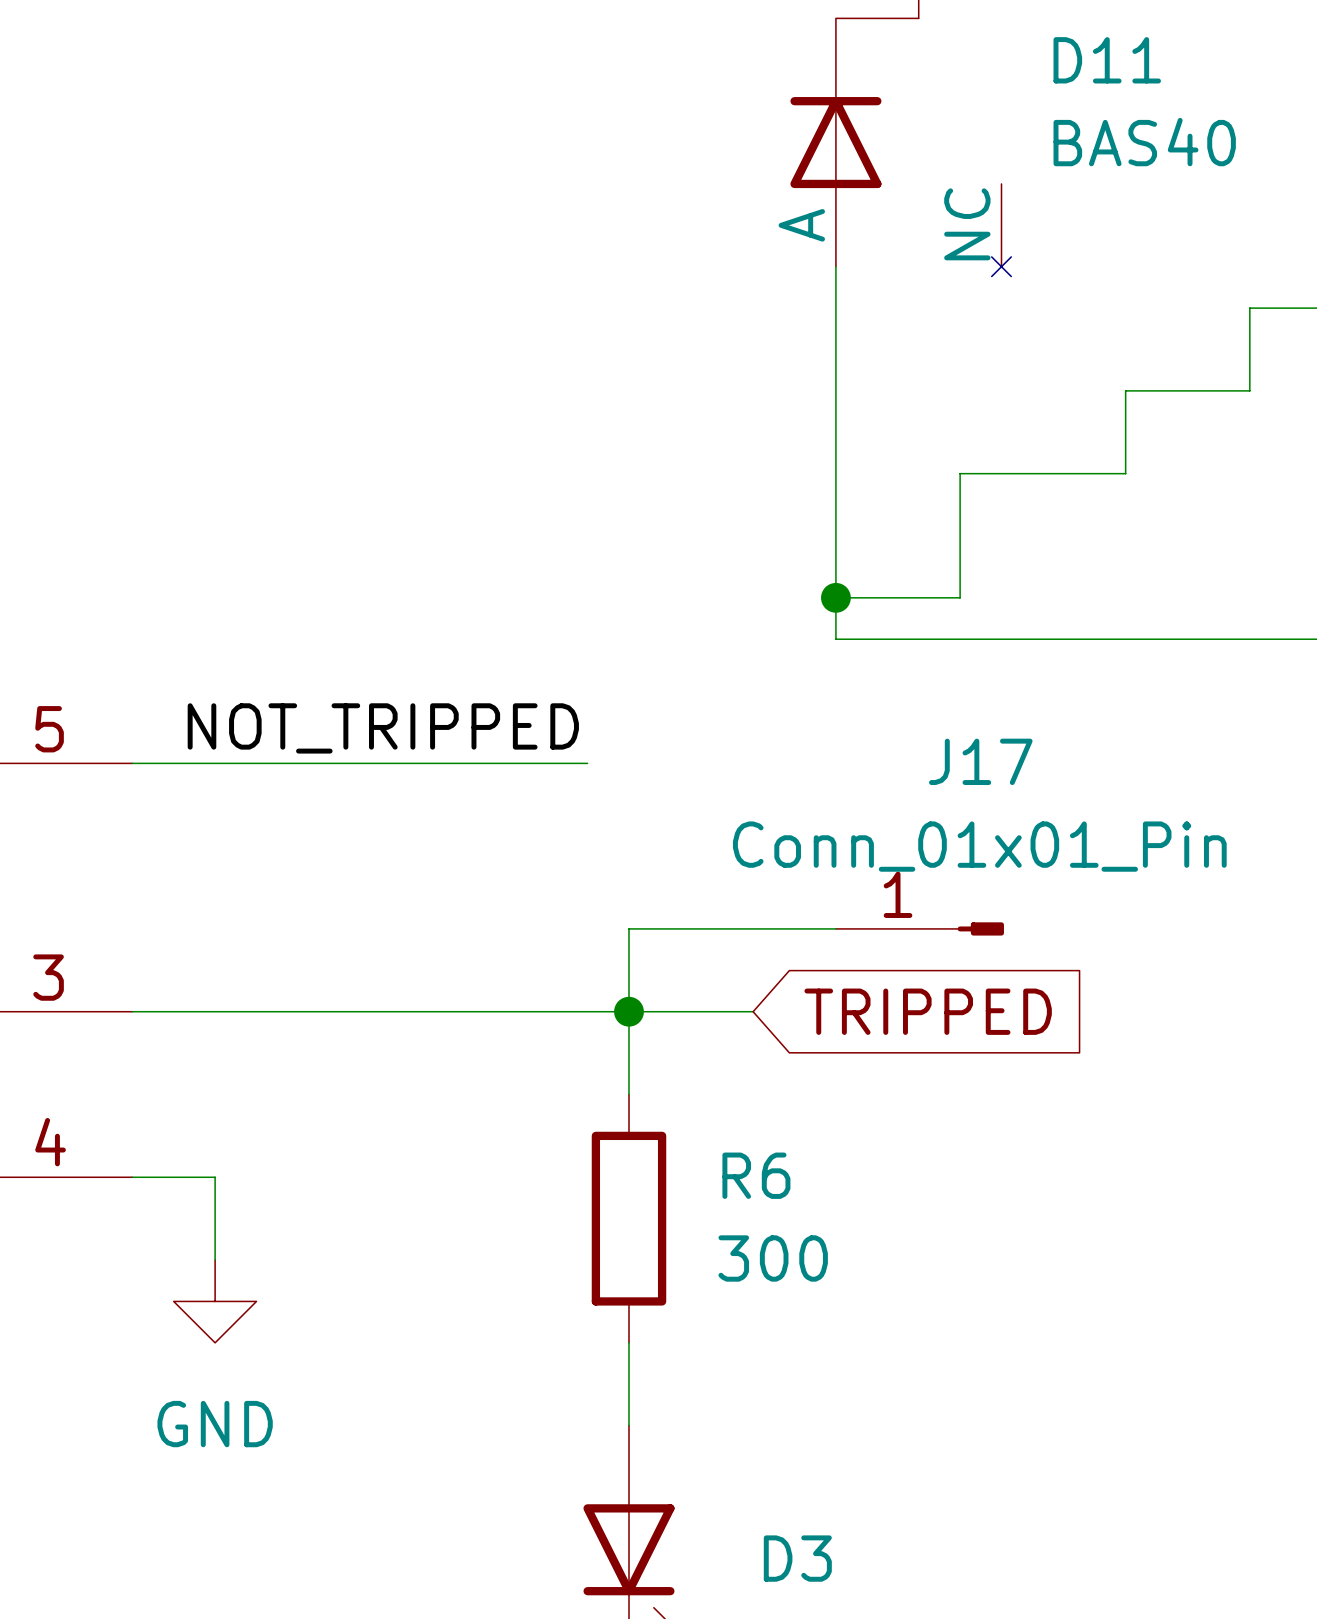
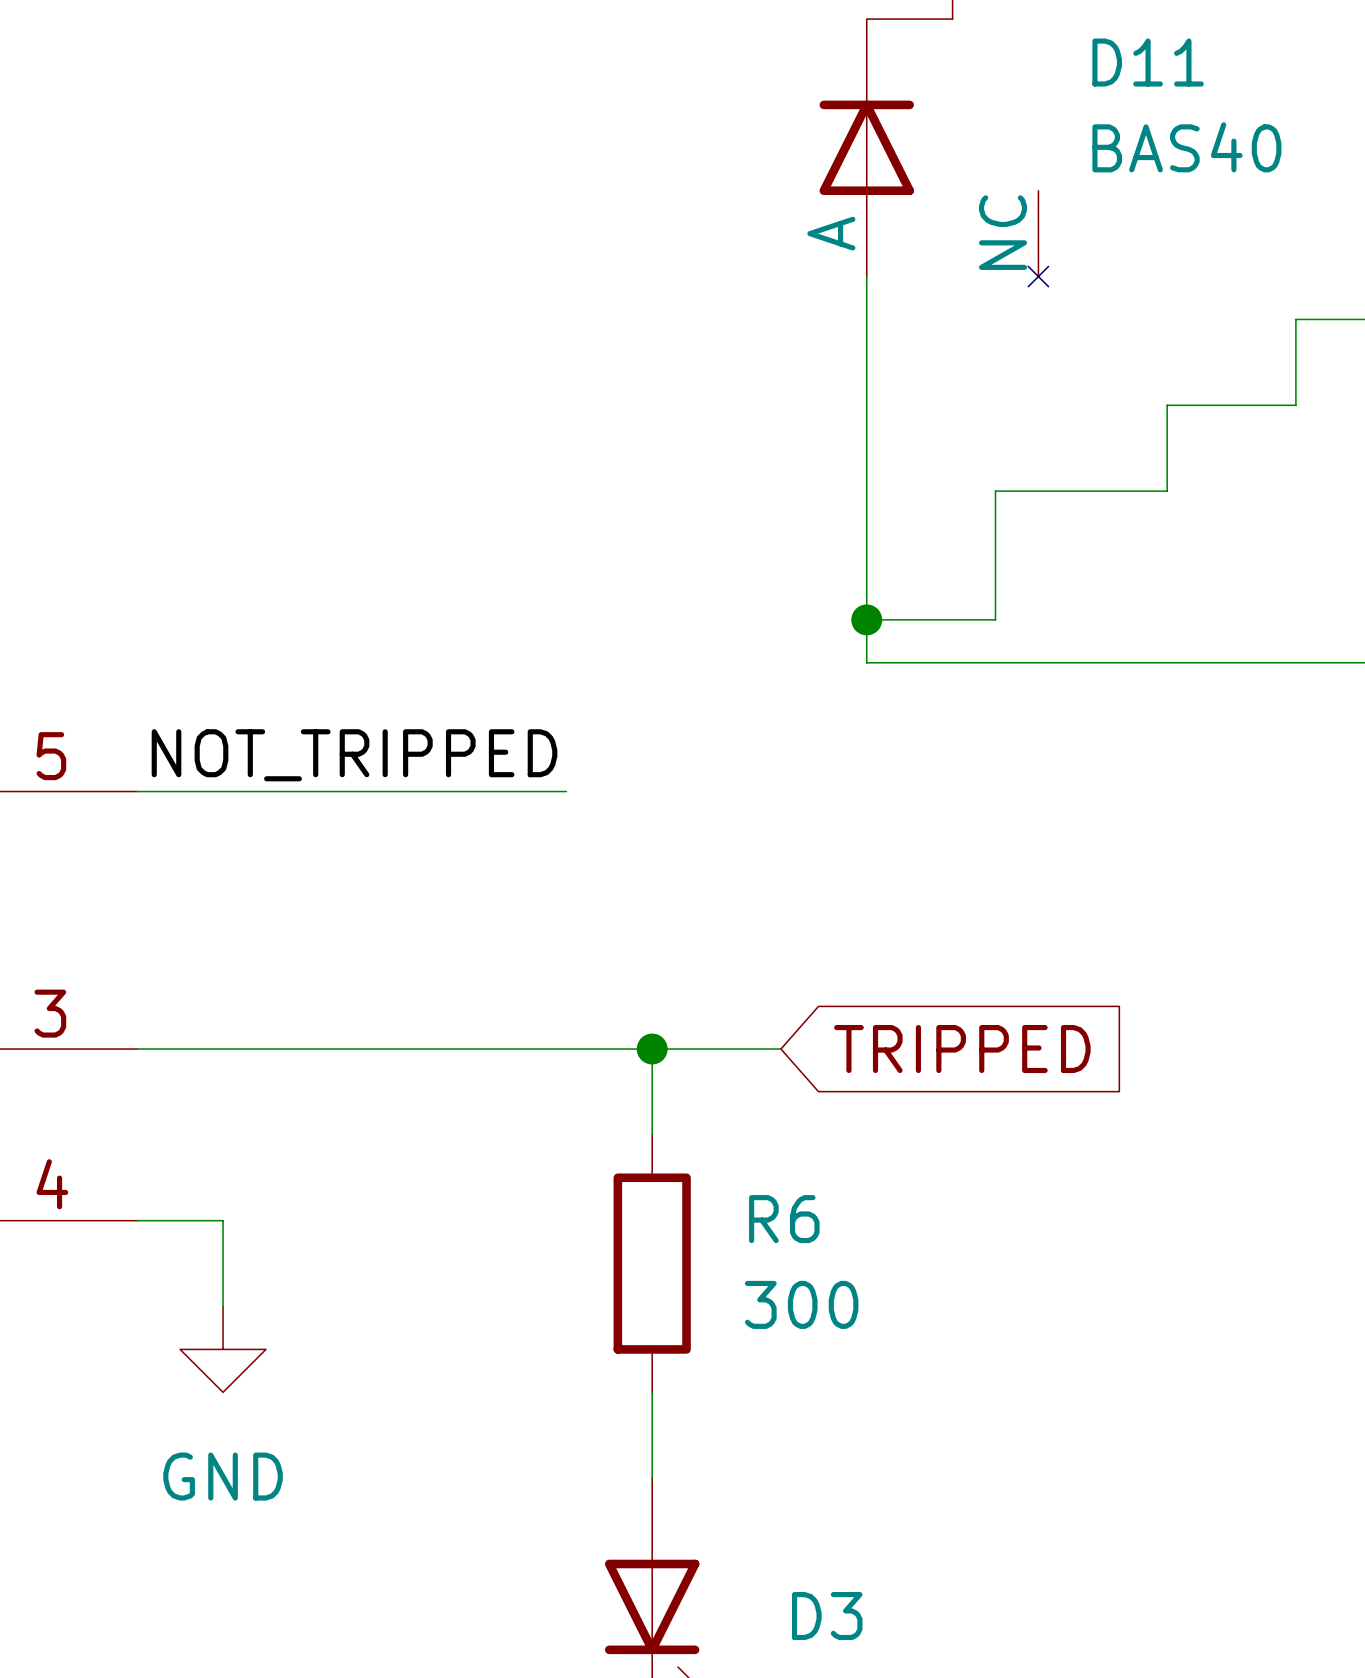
label position: NOT_TRIPPED (383, 728) -> NOT_TRIPPED (354, 755)
wire: (546, 763) (587, 763) -> none
wire: (835, 928) (628, 928) (628, 1011) -> none
J17: Conn_01x01_Pin (919, 928) -> none

